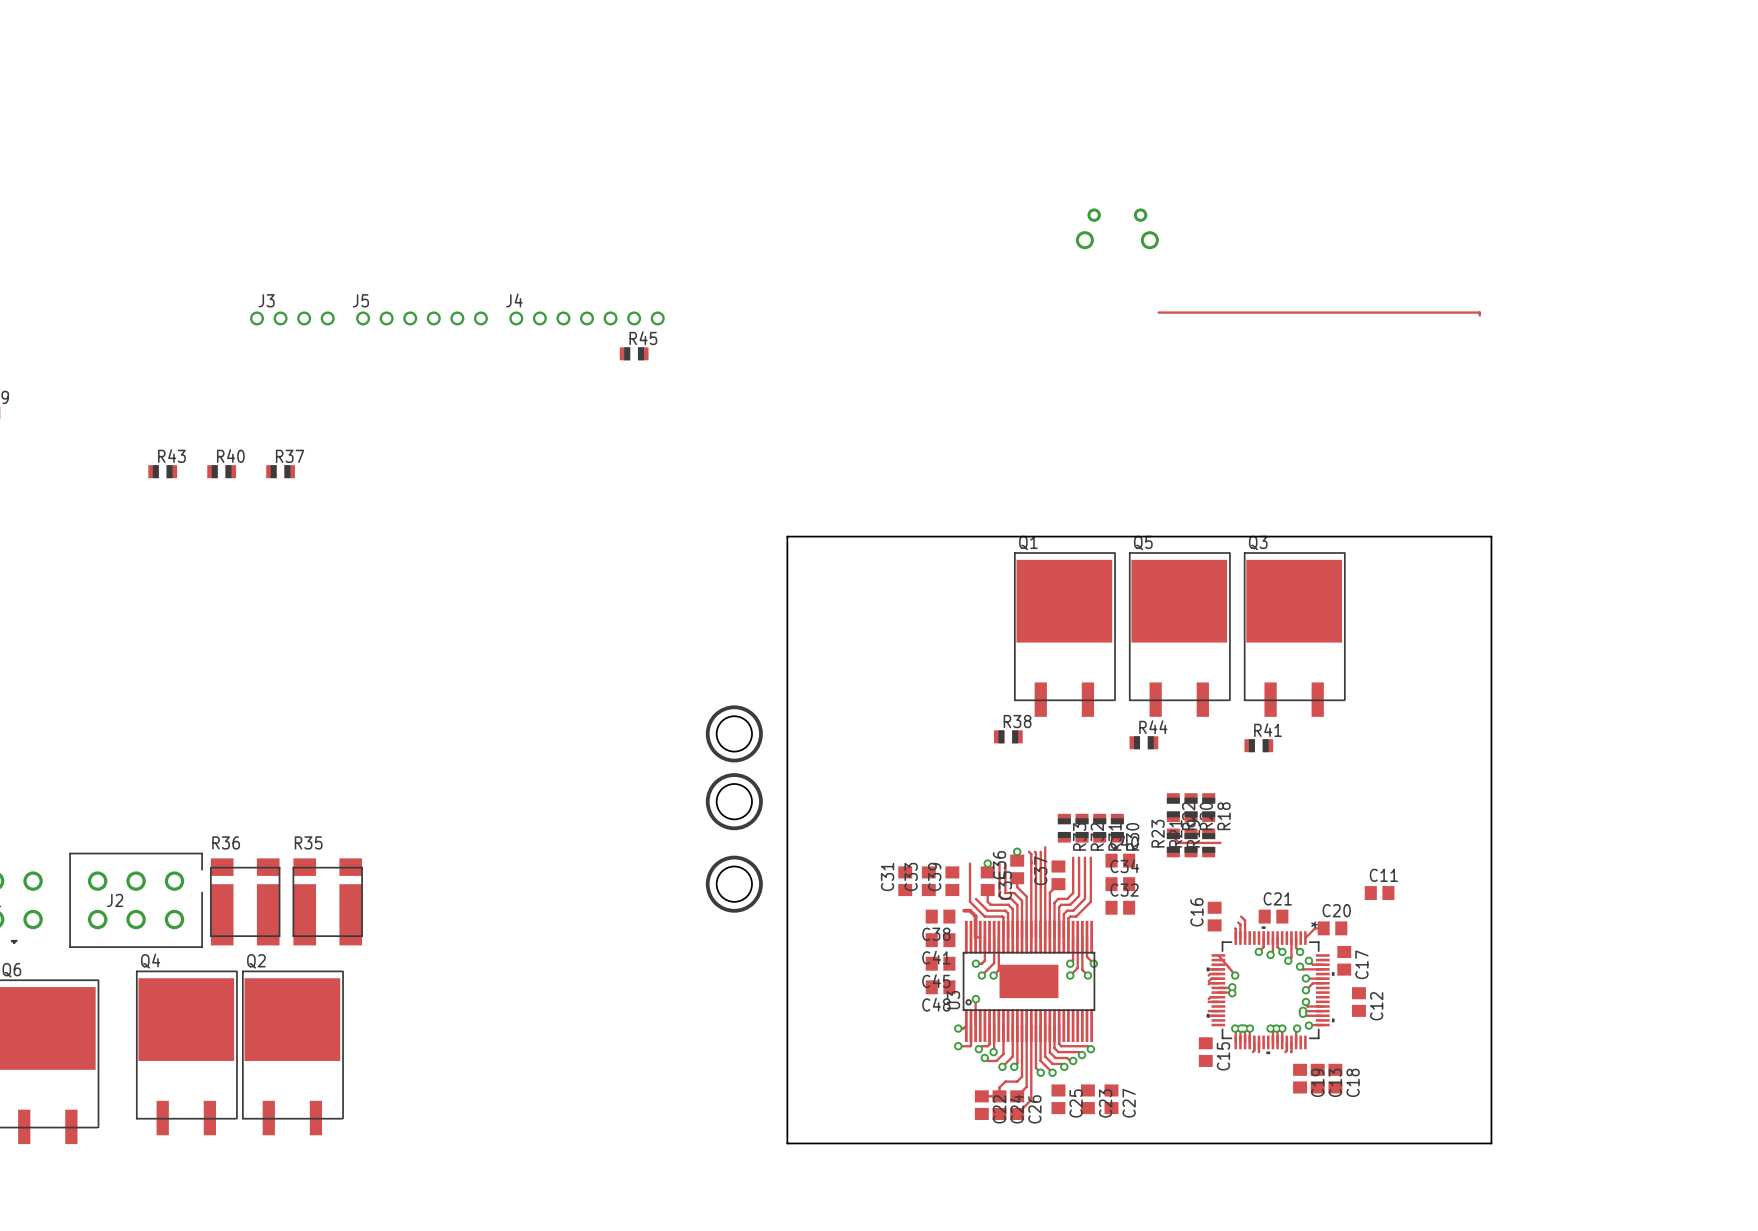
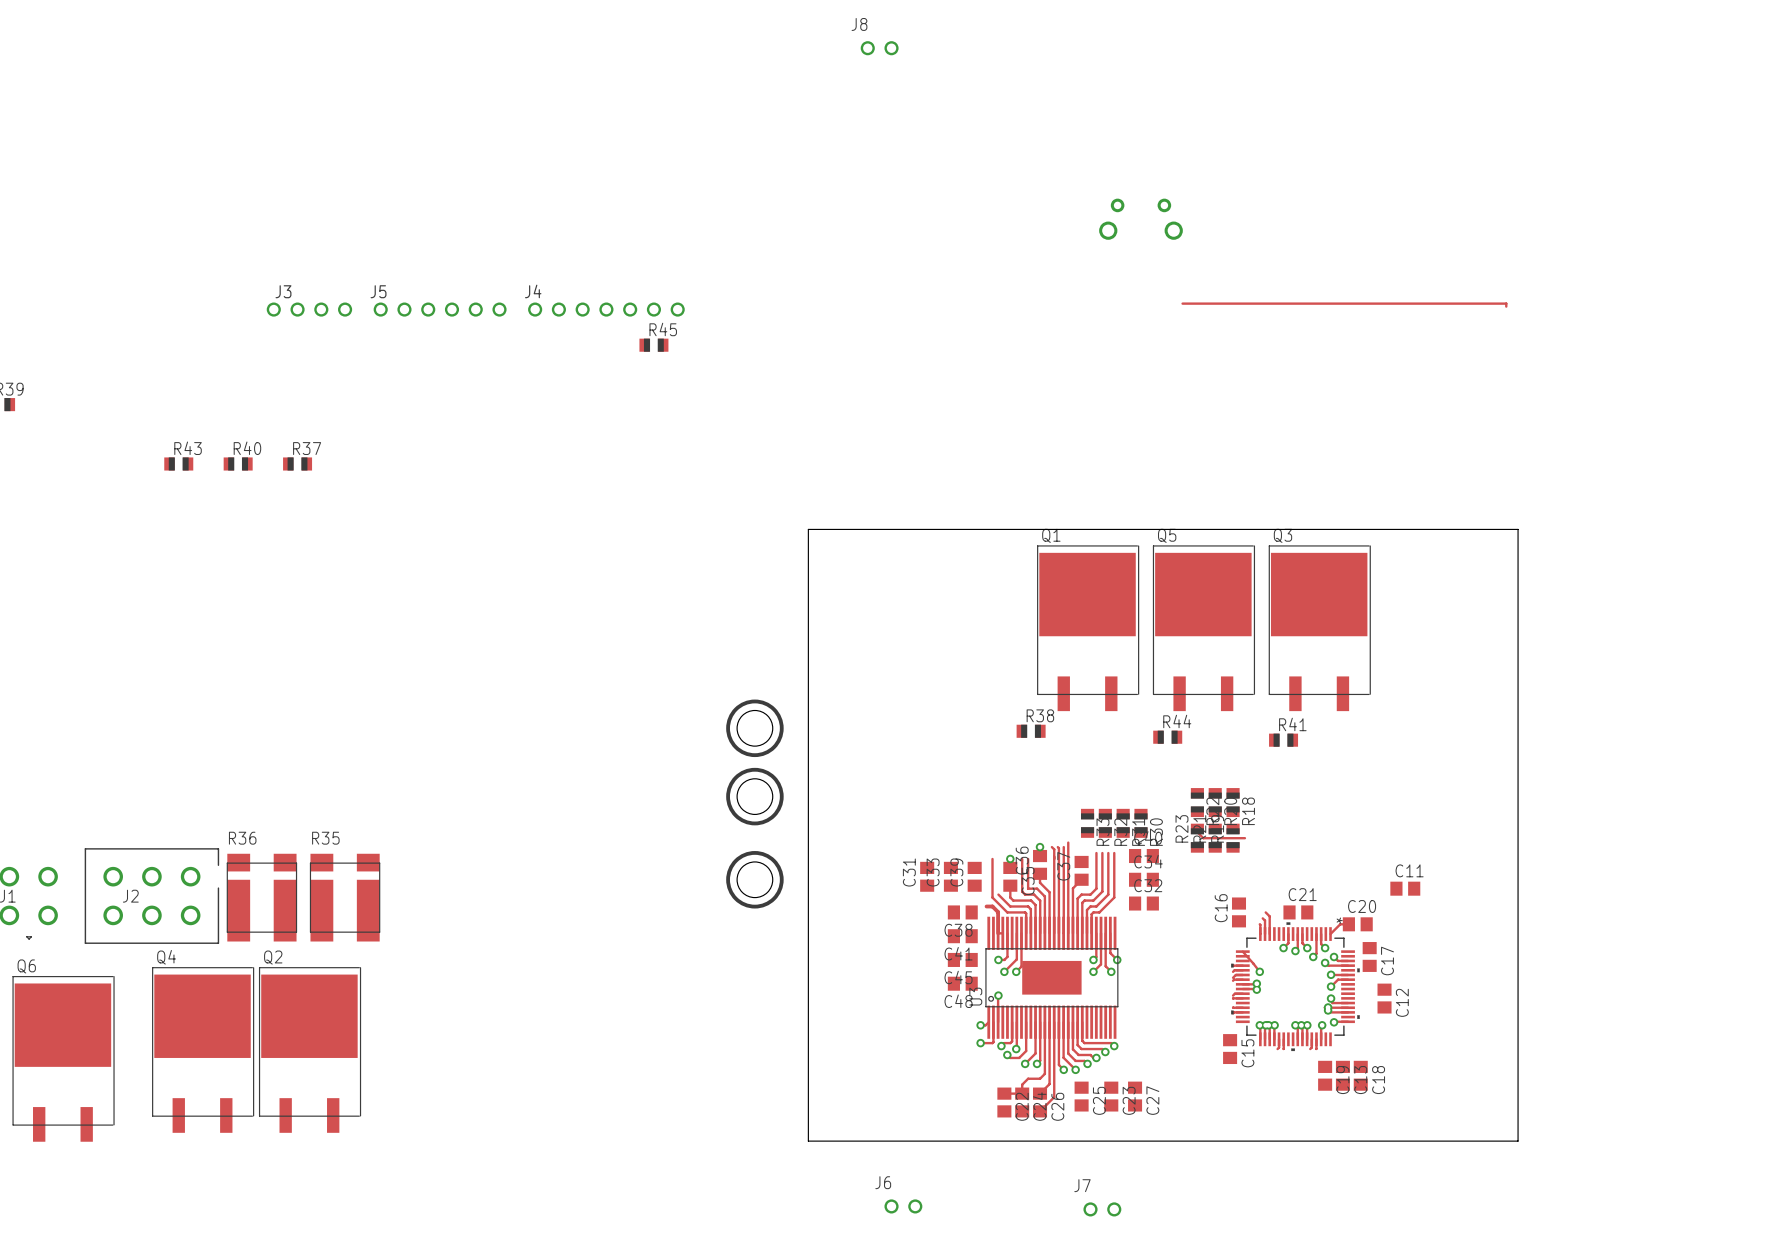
J8: none -> (879, 48)
J6: none -> (903, 1206)
J7: none -> (1102, 1209)

